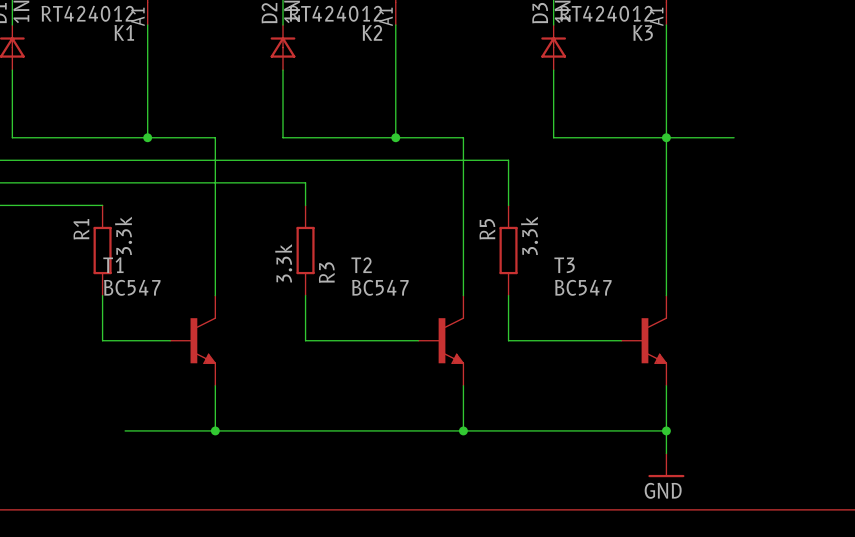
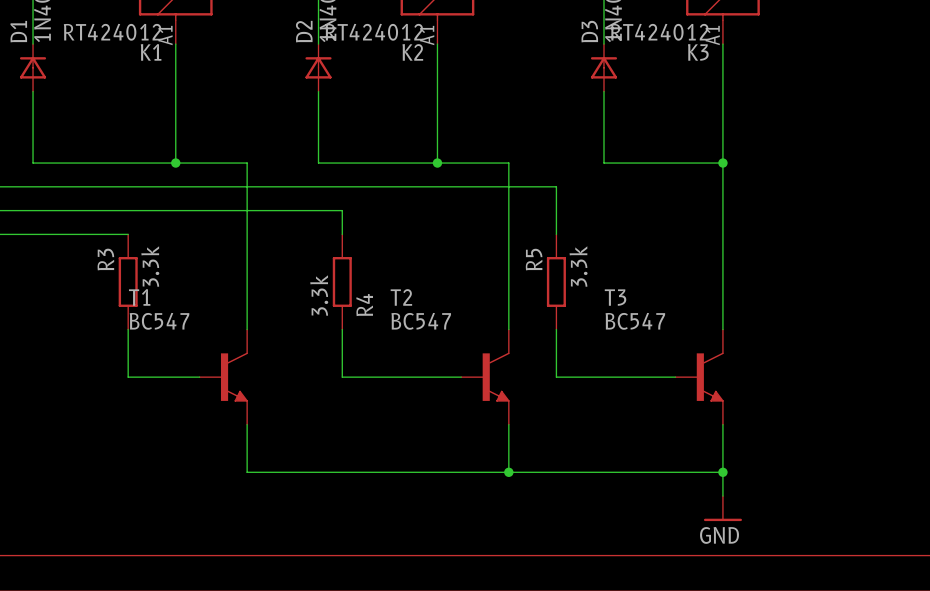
wire: (666, 137) (734, 137) -> none
R1 name: R1 (81, 229) -> R3 (105, 259)
R3 name: R3 (326, 272) -> R4 (364, 305)
wire: (125, 430) (215, 430) -> none
junction: (215, 430) -> none

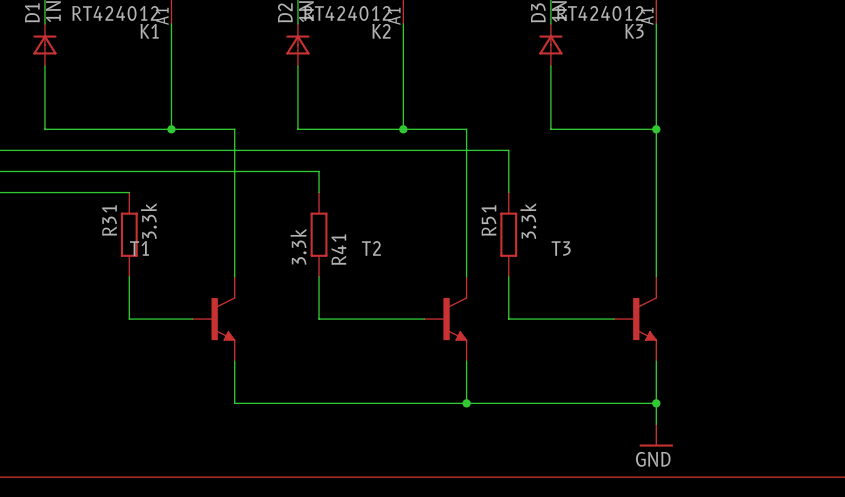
R3 name: R3 (105, 259) -> R31 (109, 220)
R5 name: R5 (534, 259) -> R51 (488, 220)
R4 name: R4 (364, 305) -> R41 (338, 249)
T1 value: BC547 (159, 321) -> none
T2 value: BC547 (421, 321) -> none
T3 value: BC547 (635, 321) -> none

